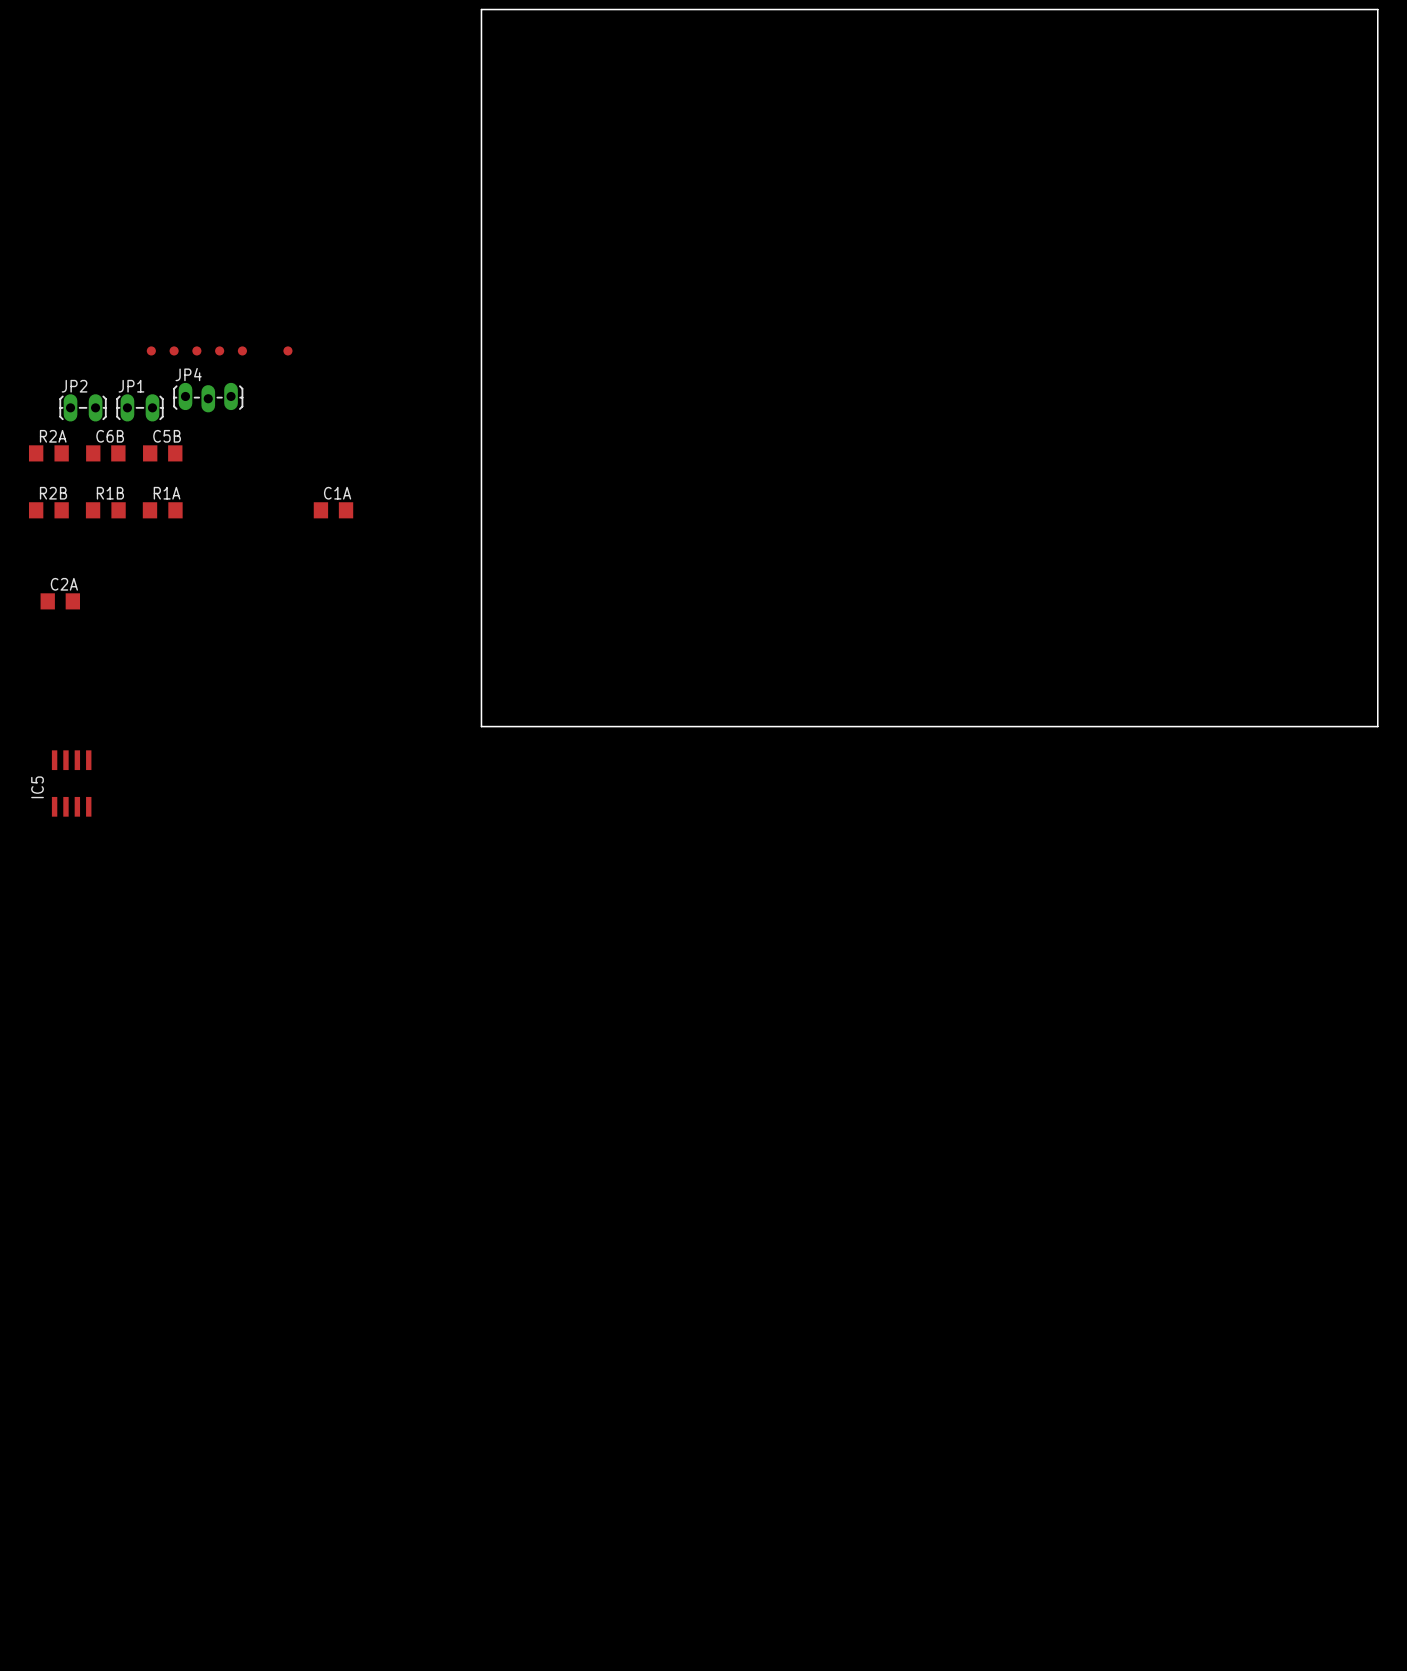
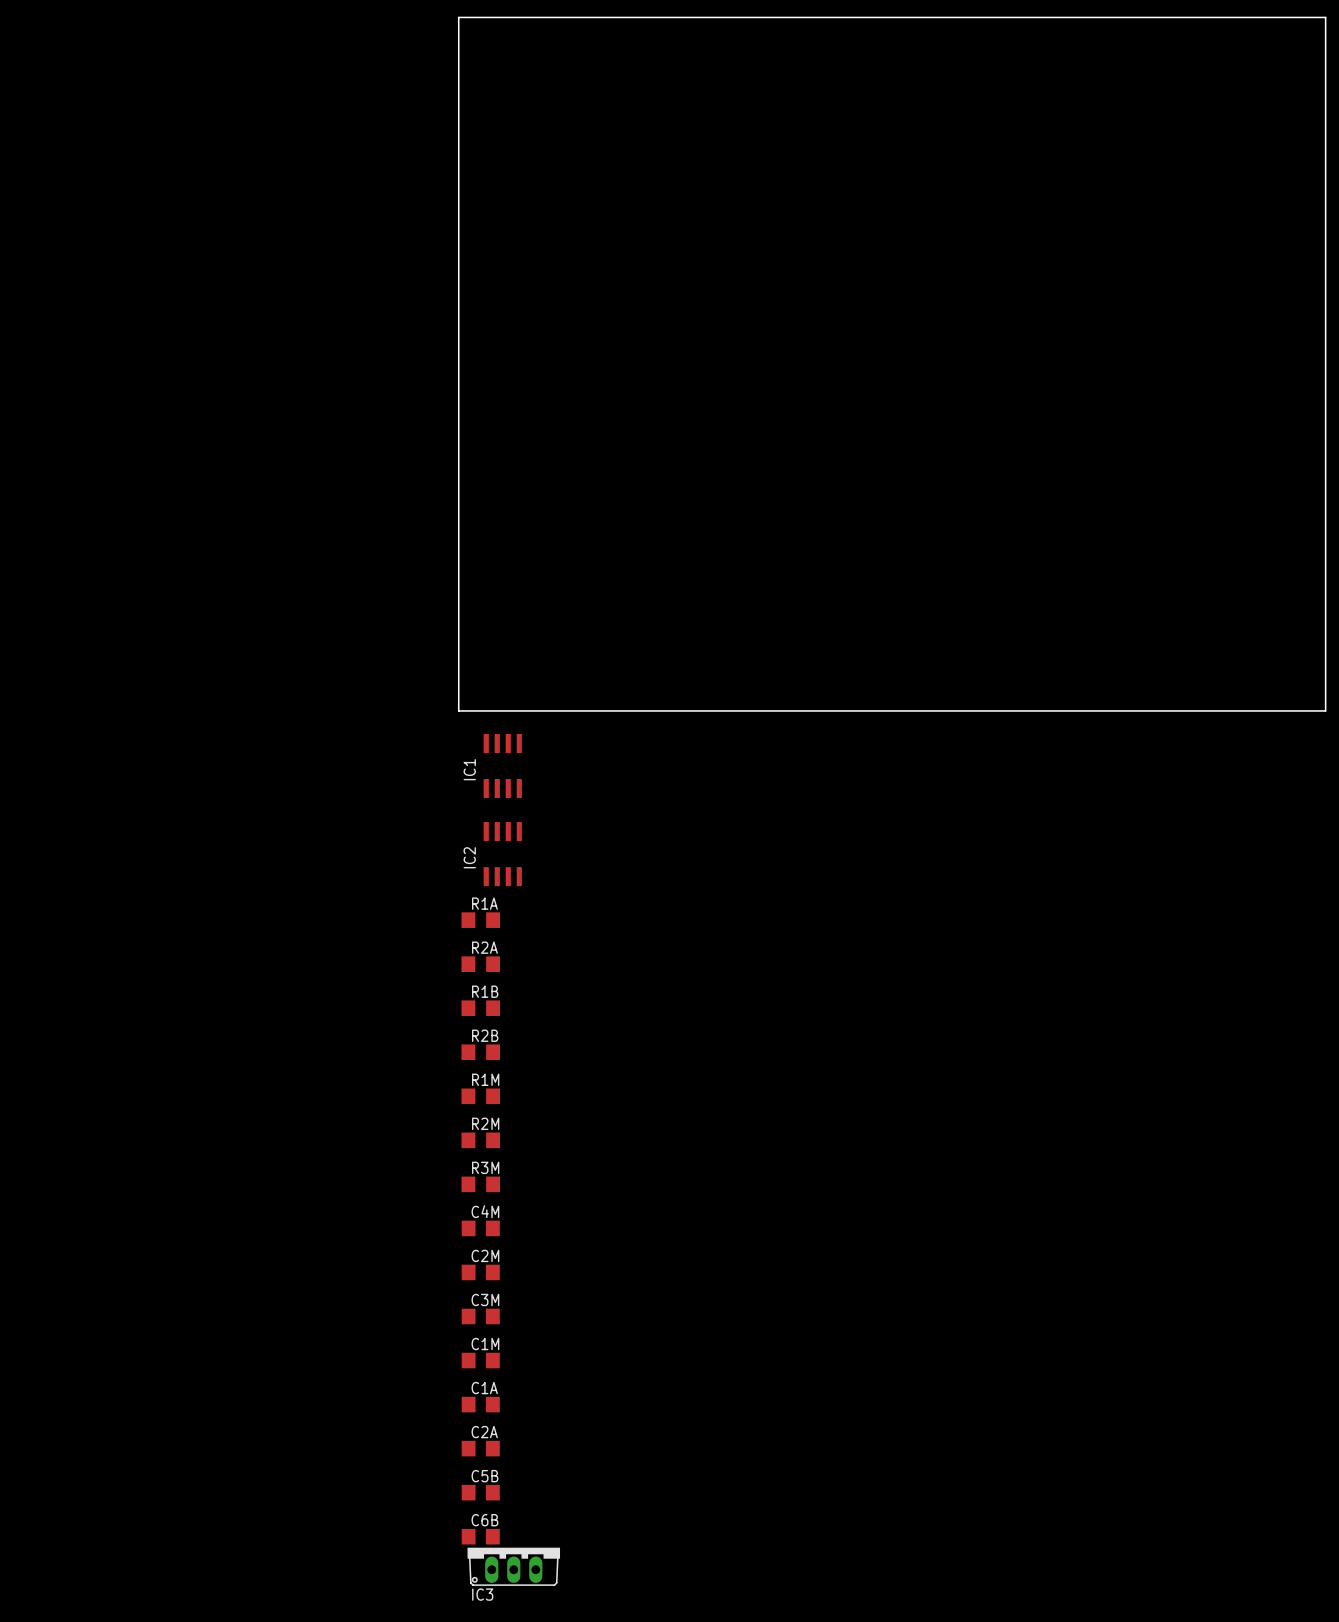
part: (151, 350) -> none
part: (174, 350) -> none
part: (196, 350) -> none
part: (219, 350) -> none
part: (242, 350) -> none
part: (287, 350) -> none
JP4: (208, 397) -> none
JP2: (83, 407) -> none
JP1: (139, 407) -> none
R2A position: (48, 453) -> (480, 964)
C6B position: (105, 453) -> (480, 1536)
C5B position: (162, 453) -> (480, 1492)
R2B position: (48, 510) -> (480, 1052)
R1B position: (105, 510) -> (480, 1008)
R1A position: (162, 510) -> (480, 920)
C1A position: (333, 510) -> (480, 1404)
C2A position: (60, 601) -> (480, 1448)
IC5: (71, 783) -> none
IC1: none -> (502, 766)
IC2: none -> (502, 854)
R1M: none -> (480, 1096)
R2M: none -> (480, 1140)
R3M: none -> (480, 1184)
C4M: none -> (480, 1228)
C2M: none -> (480, 1272)
C3M: none -> (480, 1316)
C1M: none -> (480, 1360)
IC3: none -> (513, 1566)

